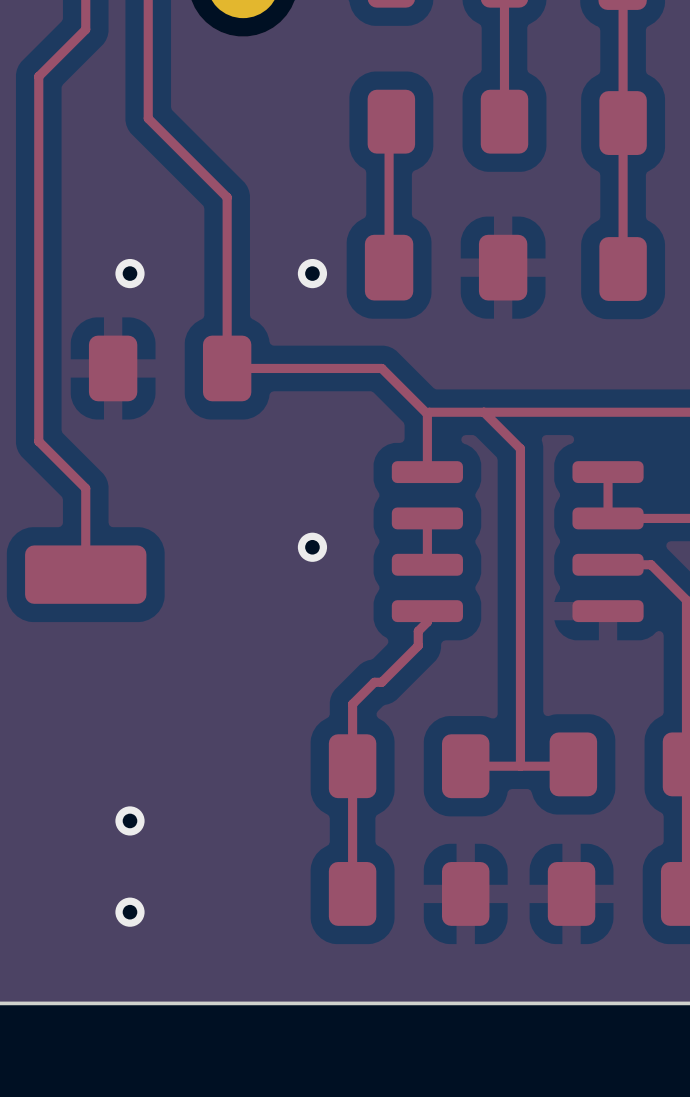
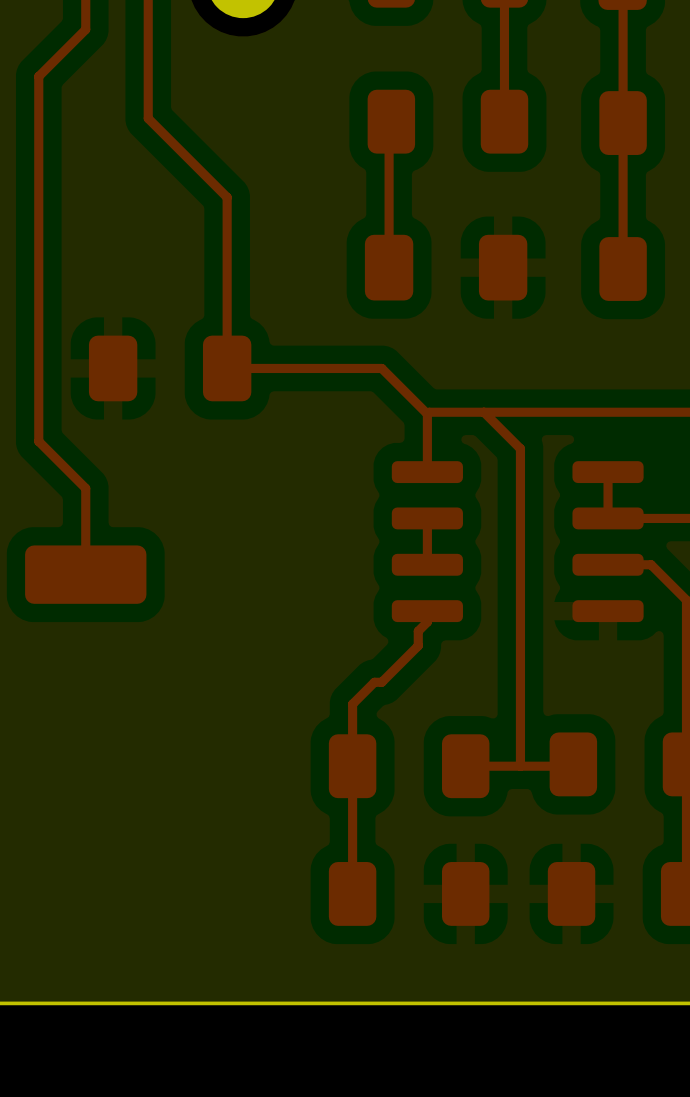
via: (129, 273) -> none
via: (312, 273) -> none
via: (312, 547) -> none
via: (129, 820) -> none
via: (129, 912) -> none

